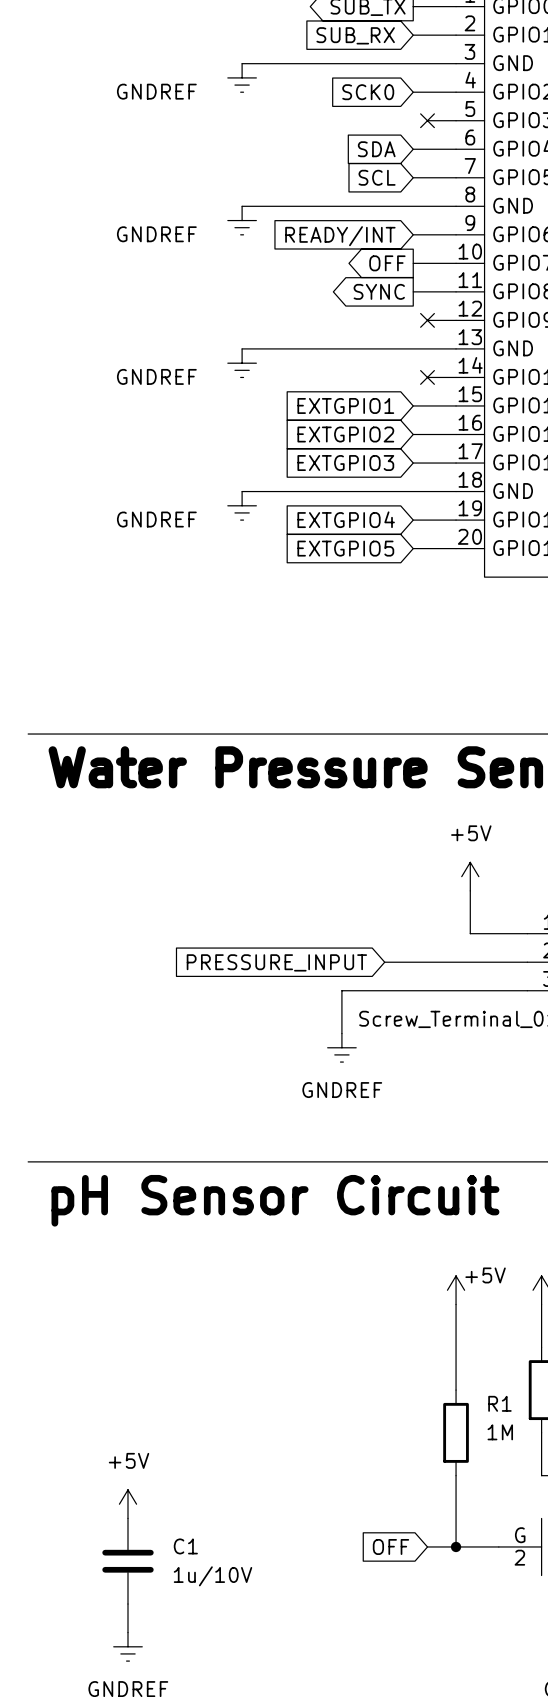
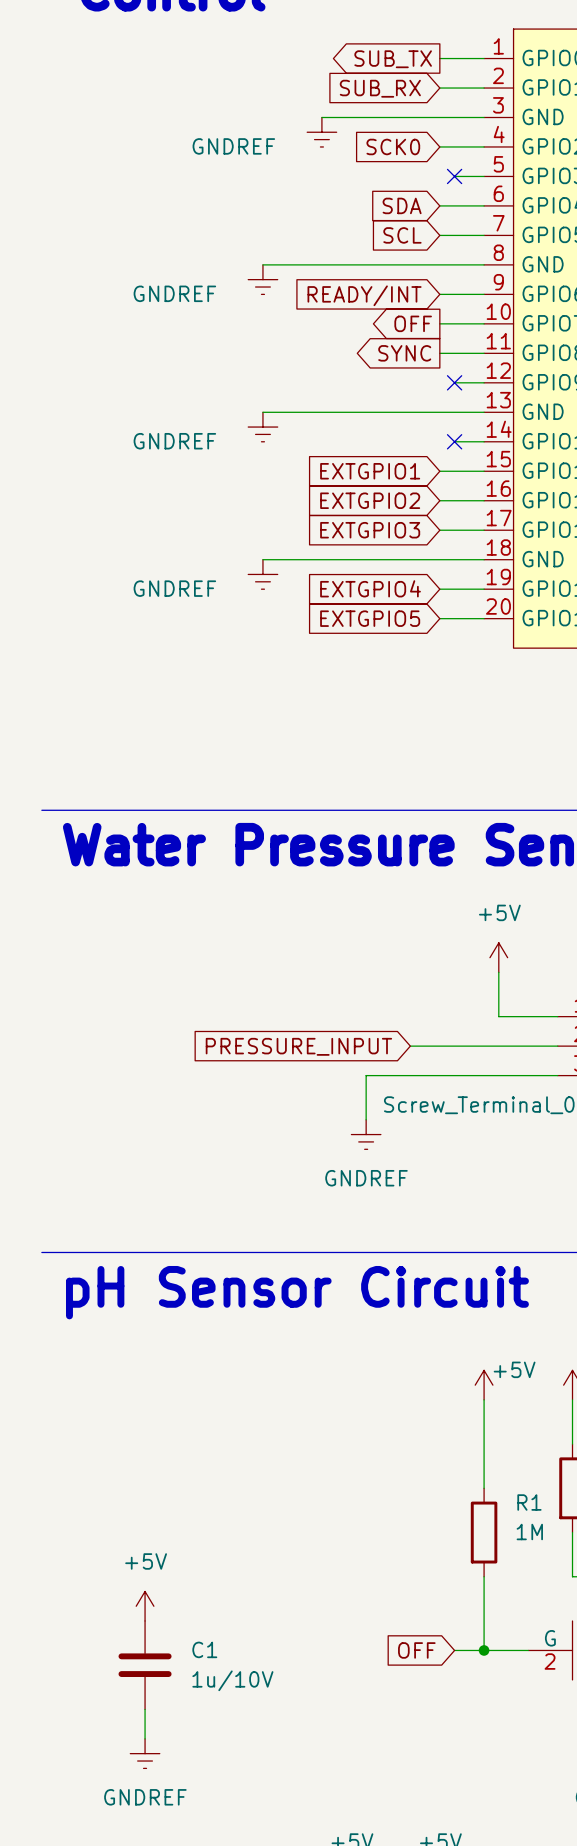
wire: (242, 63) (299, 63) -> none
power symbol position: GNDREF (242, 77) -> GNDREF (321, 132)

